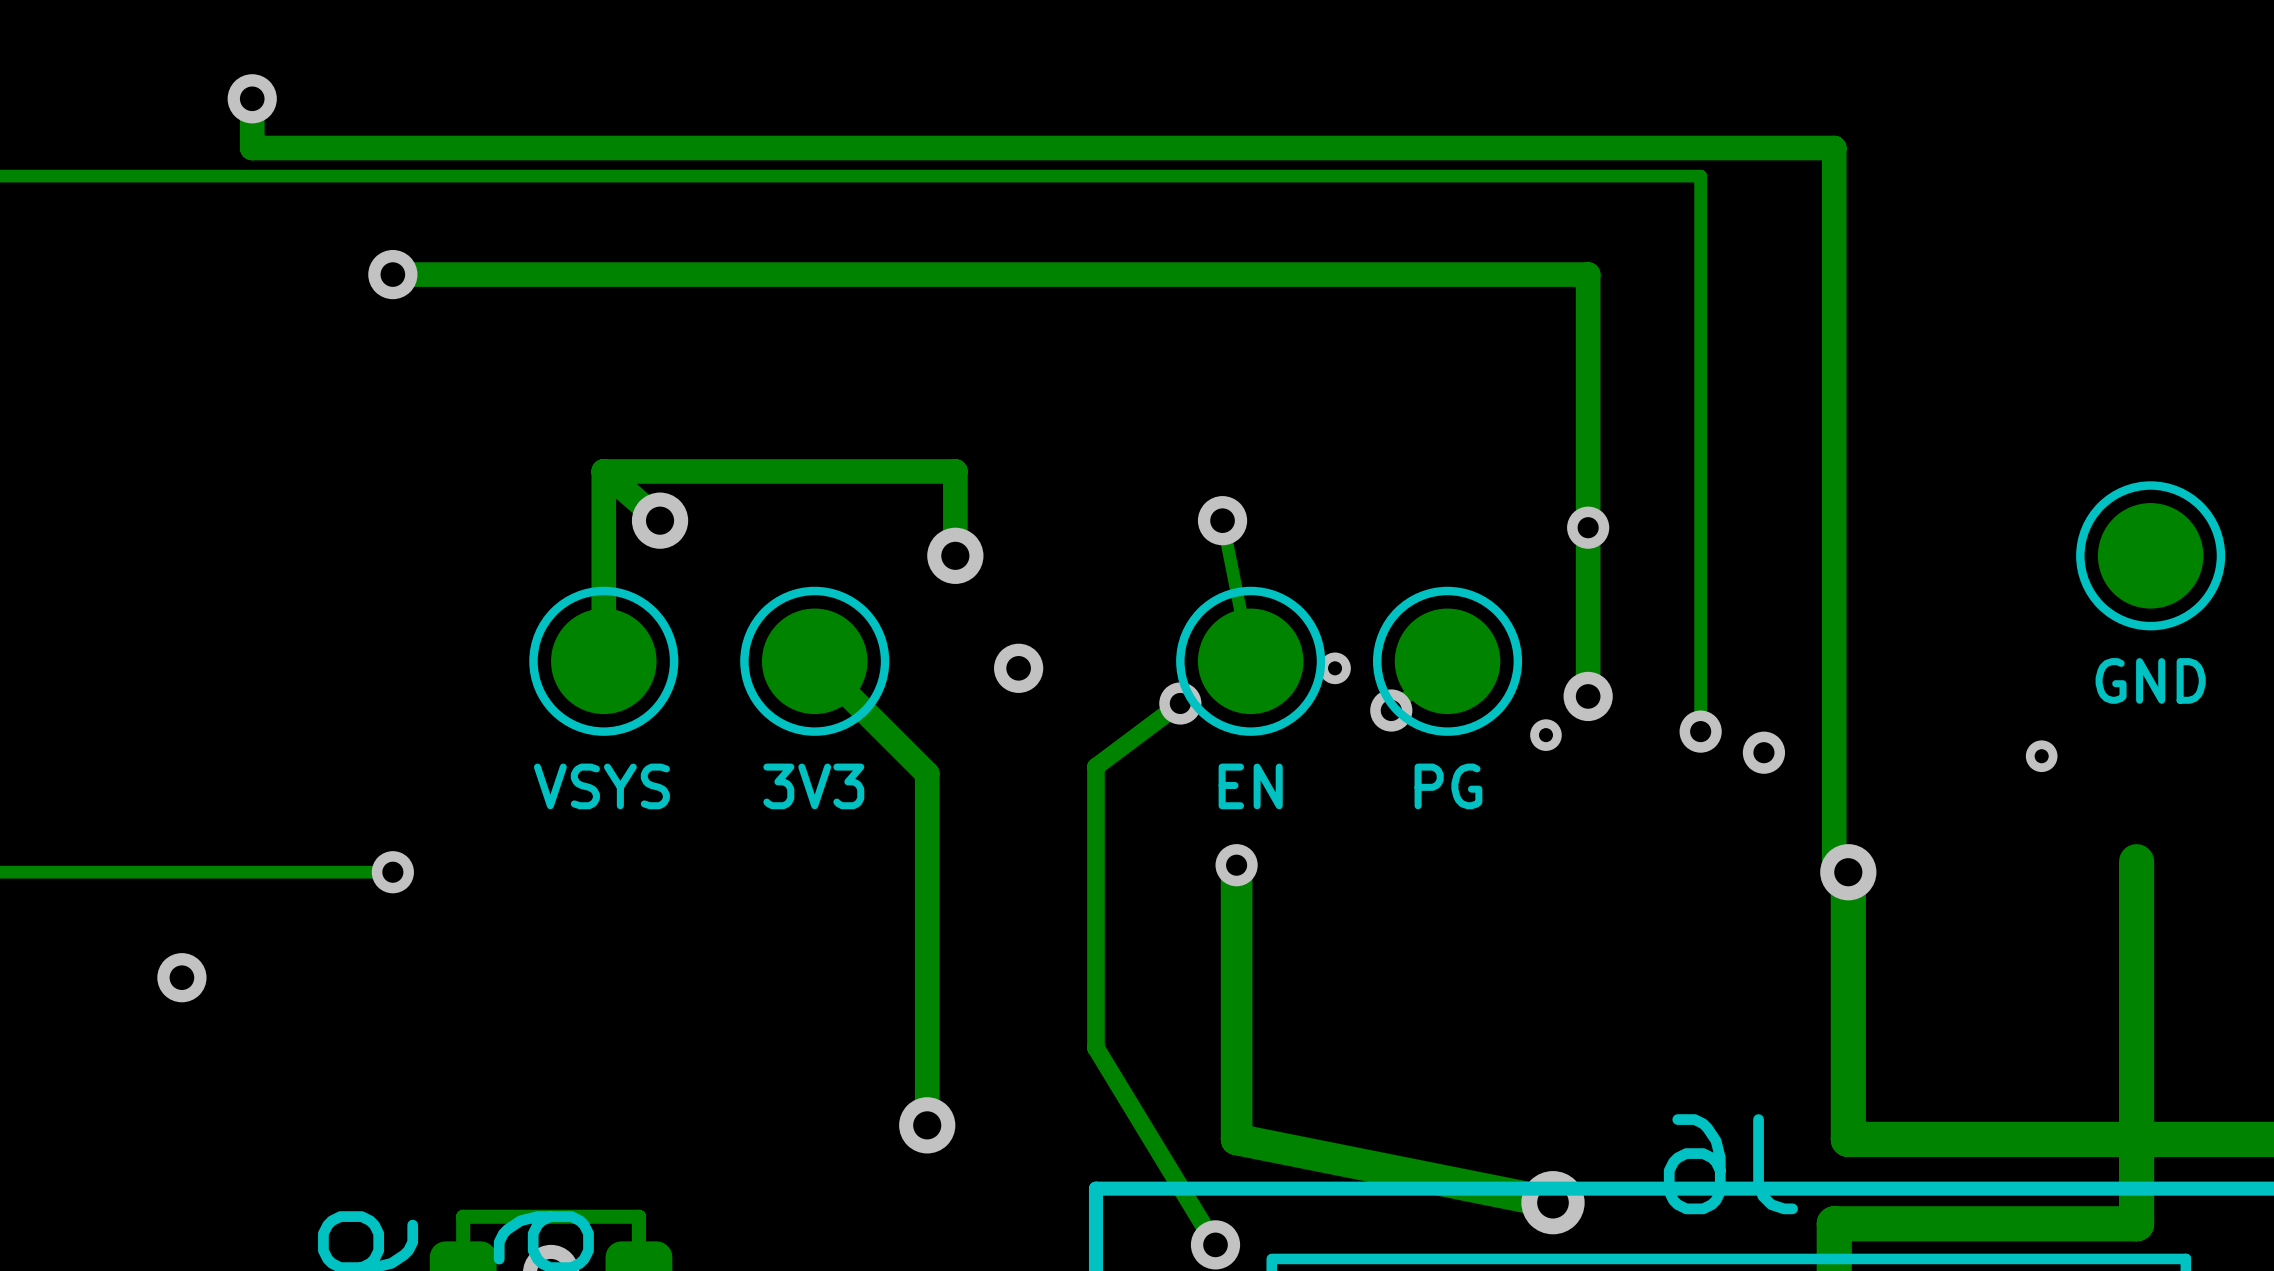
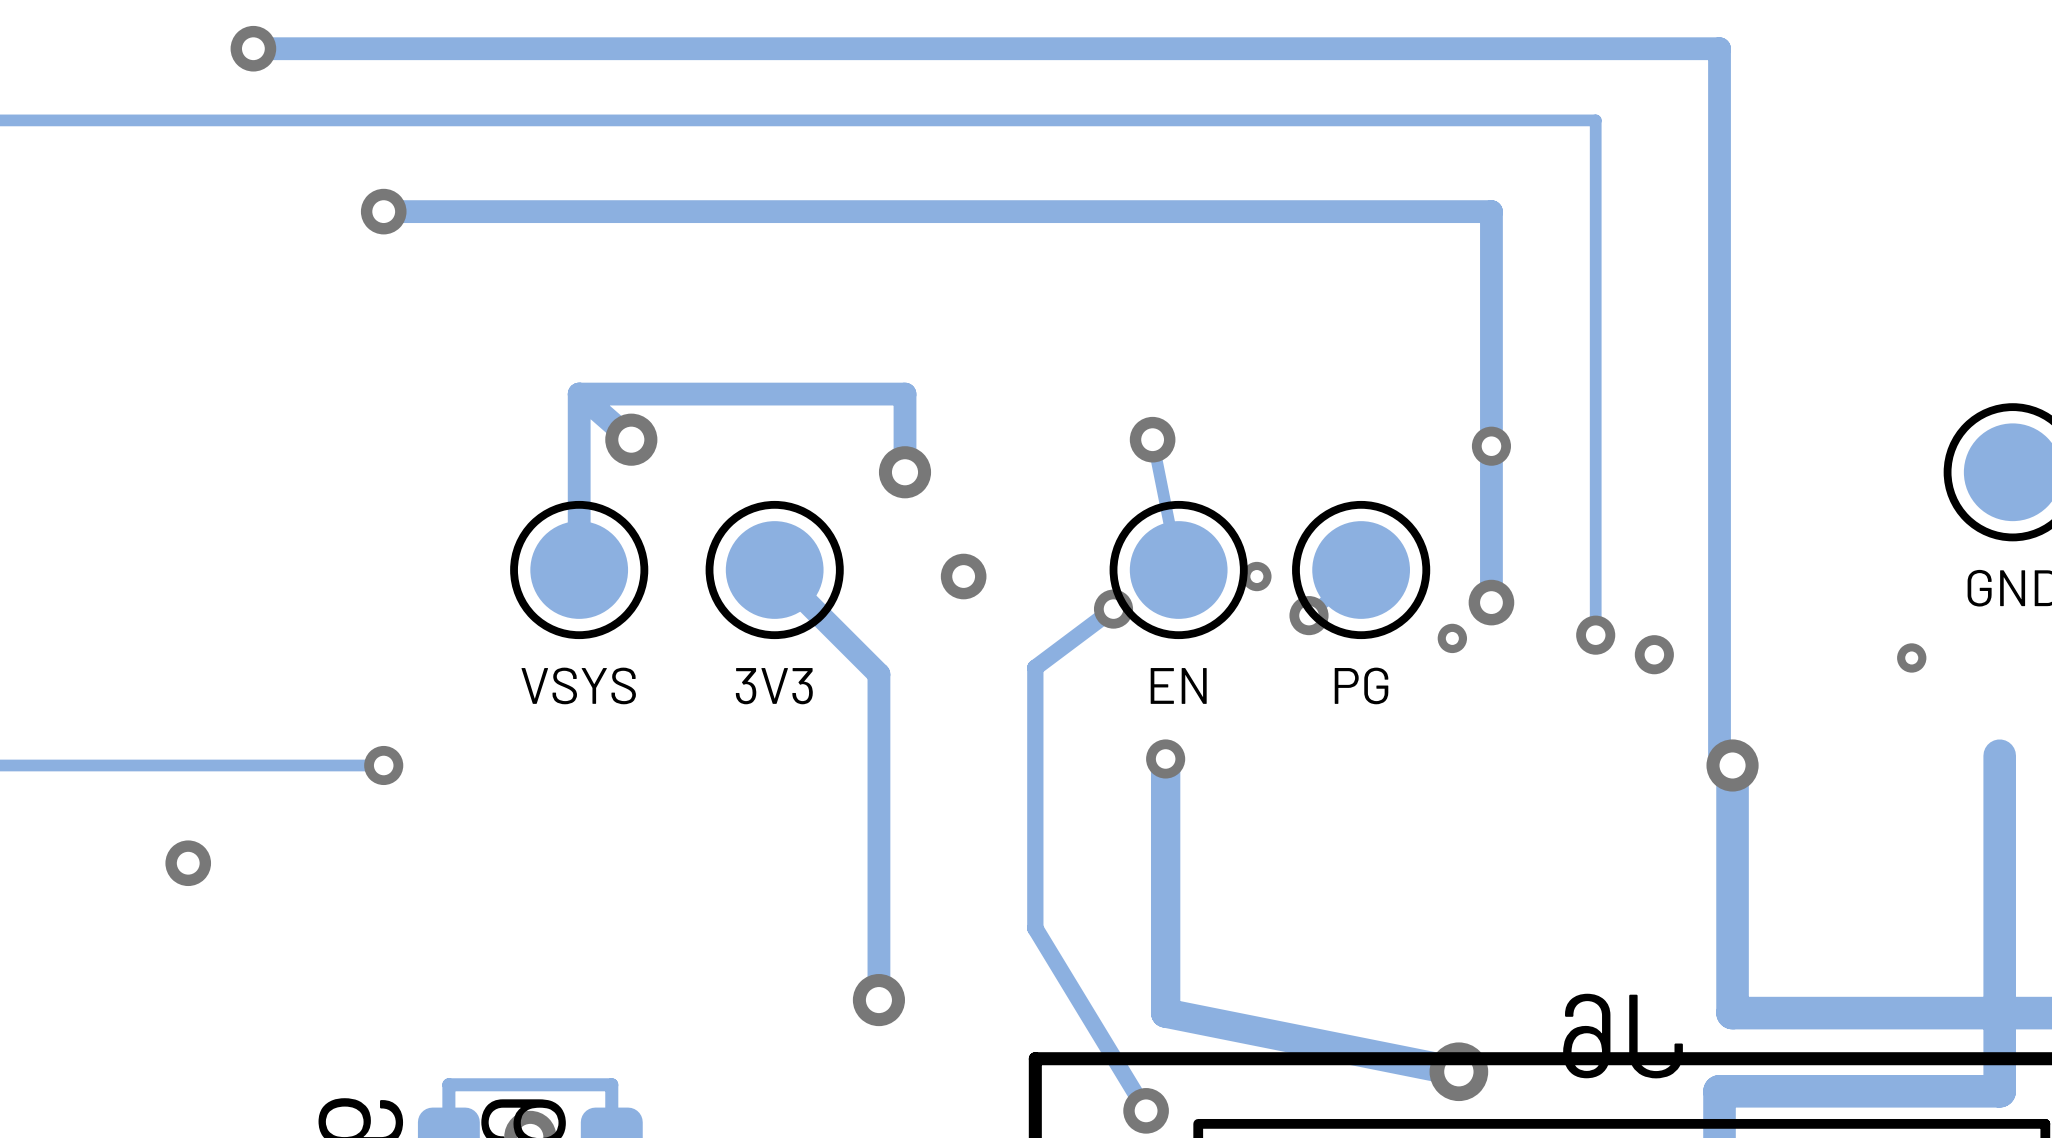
track: (252, 98) (252, 148) (1834, 148) -> (253, 48) (1719, 48) (1719, 94)

